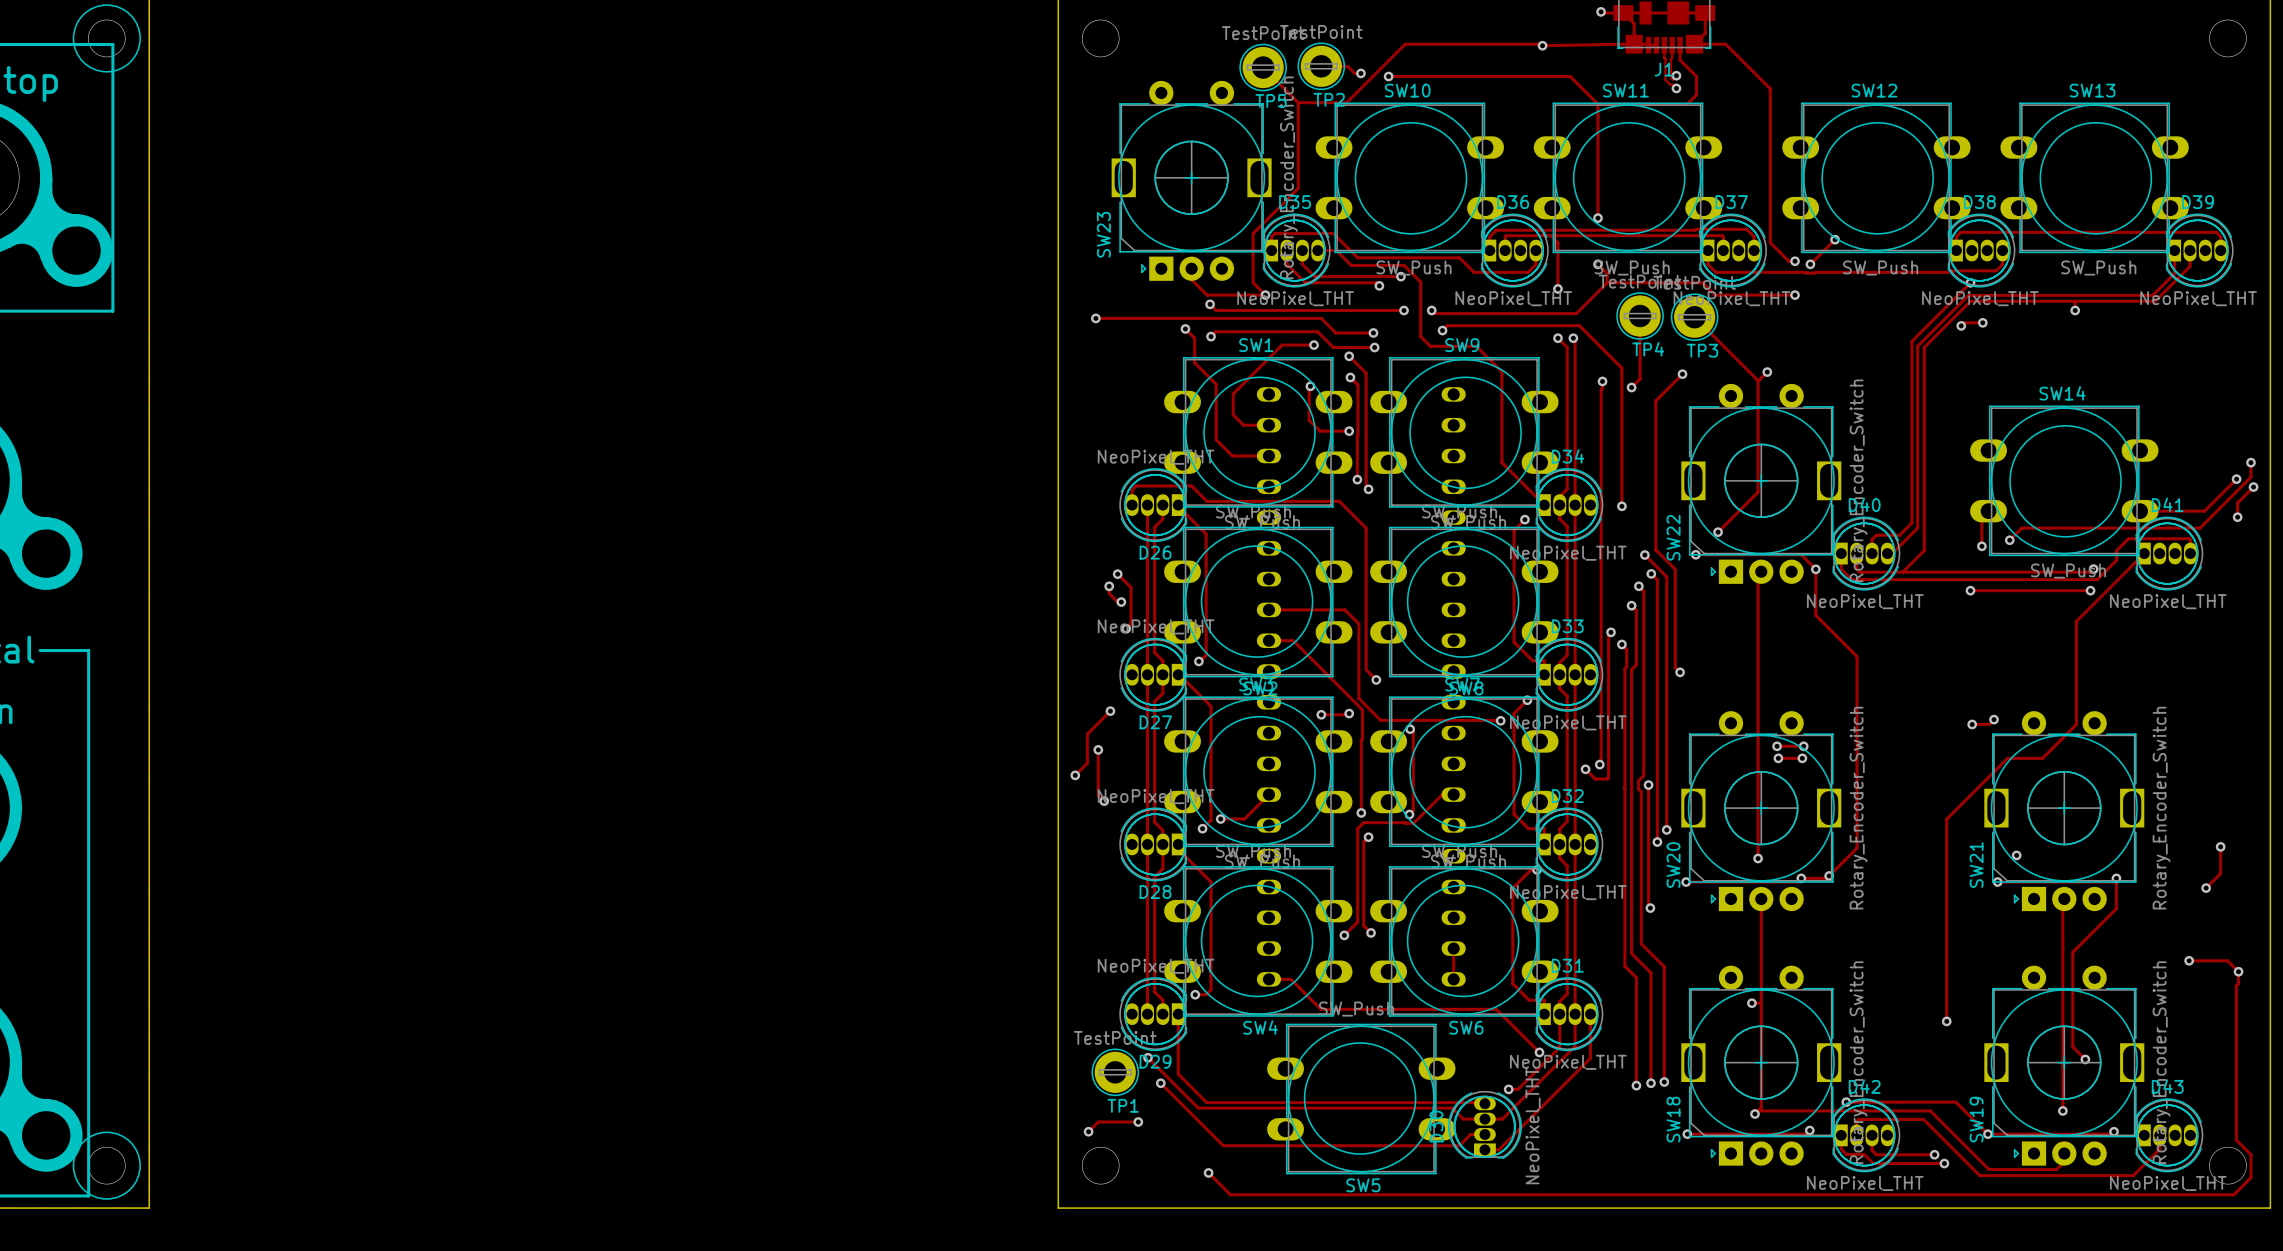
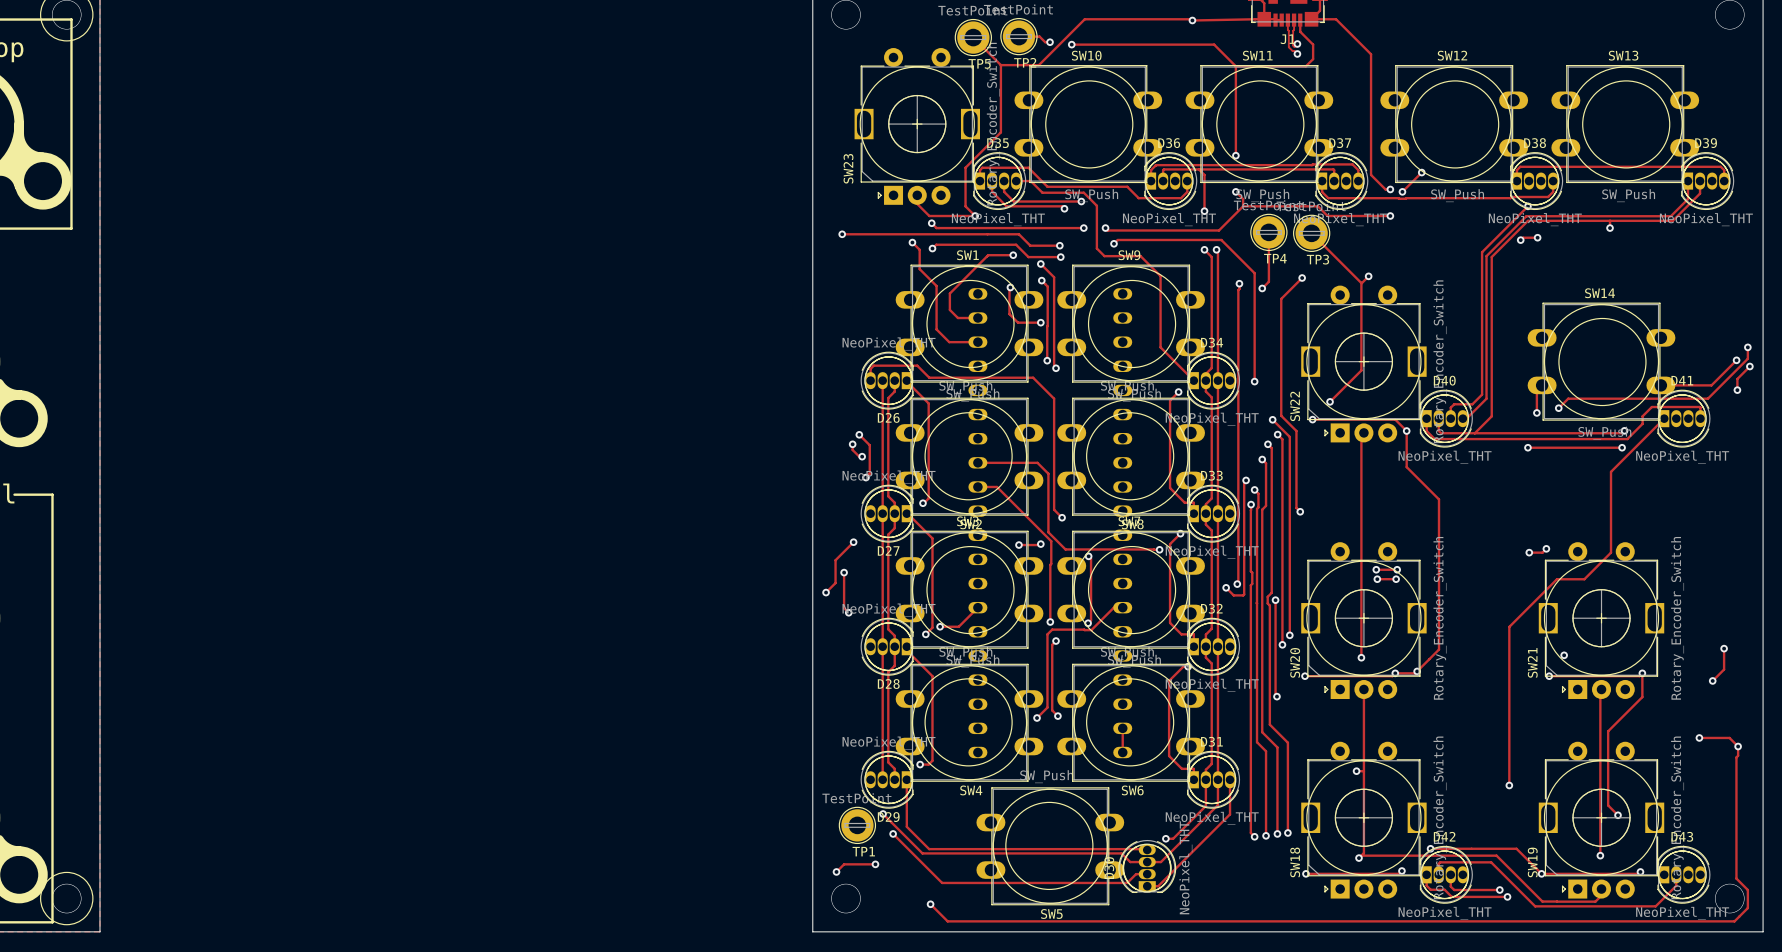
track: none -> (1251, 504) (1250, 832) (1254, 836)
via: none -> (1251, 504)
track: (1268, 979) (1290, 979) (1320, 1009) (1496, 1009) (1539, 1052) -> none
via: (1539, 1052) -> none
via: none -> (1254, 836)

